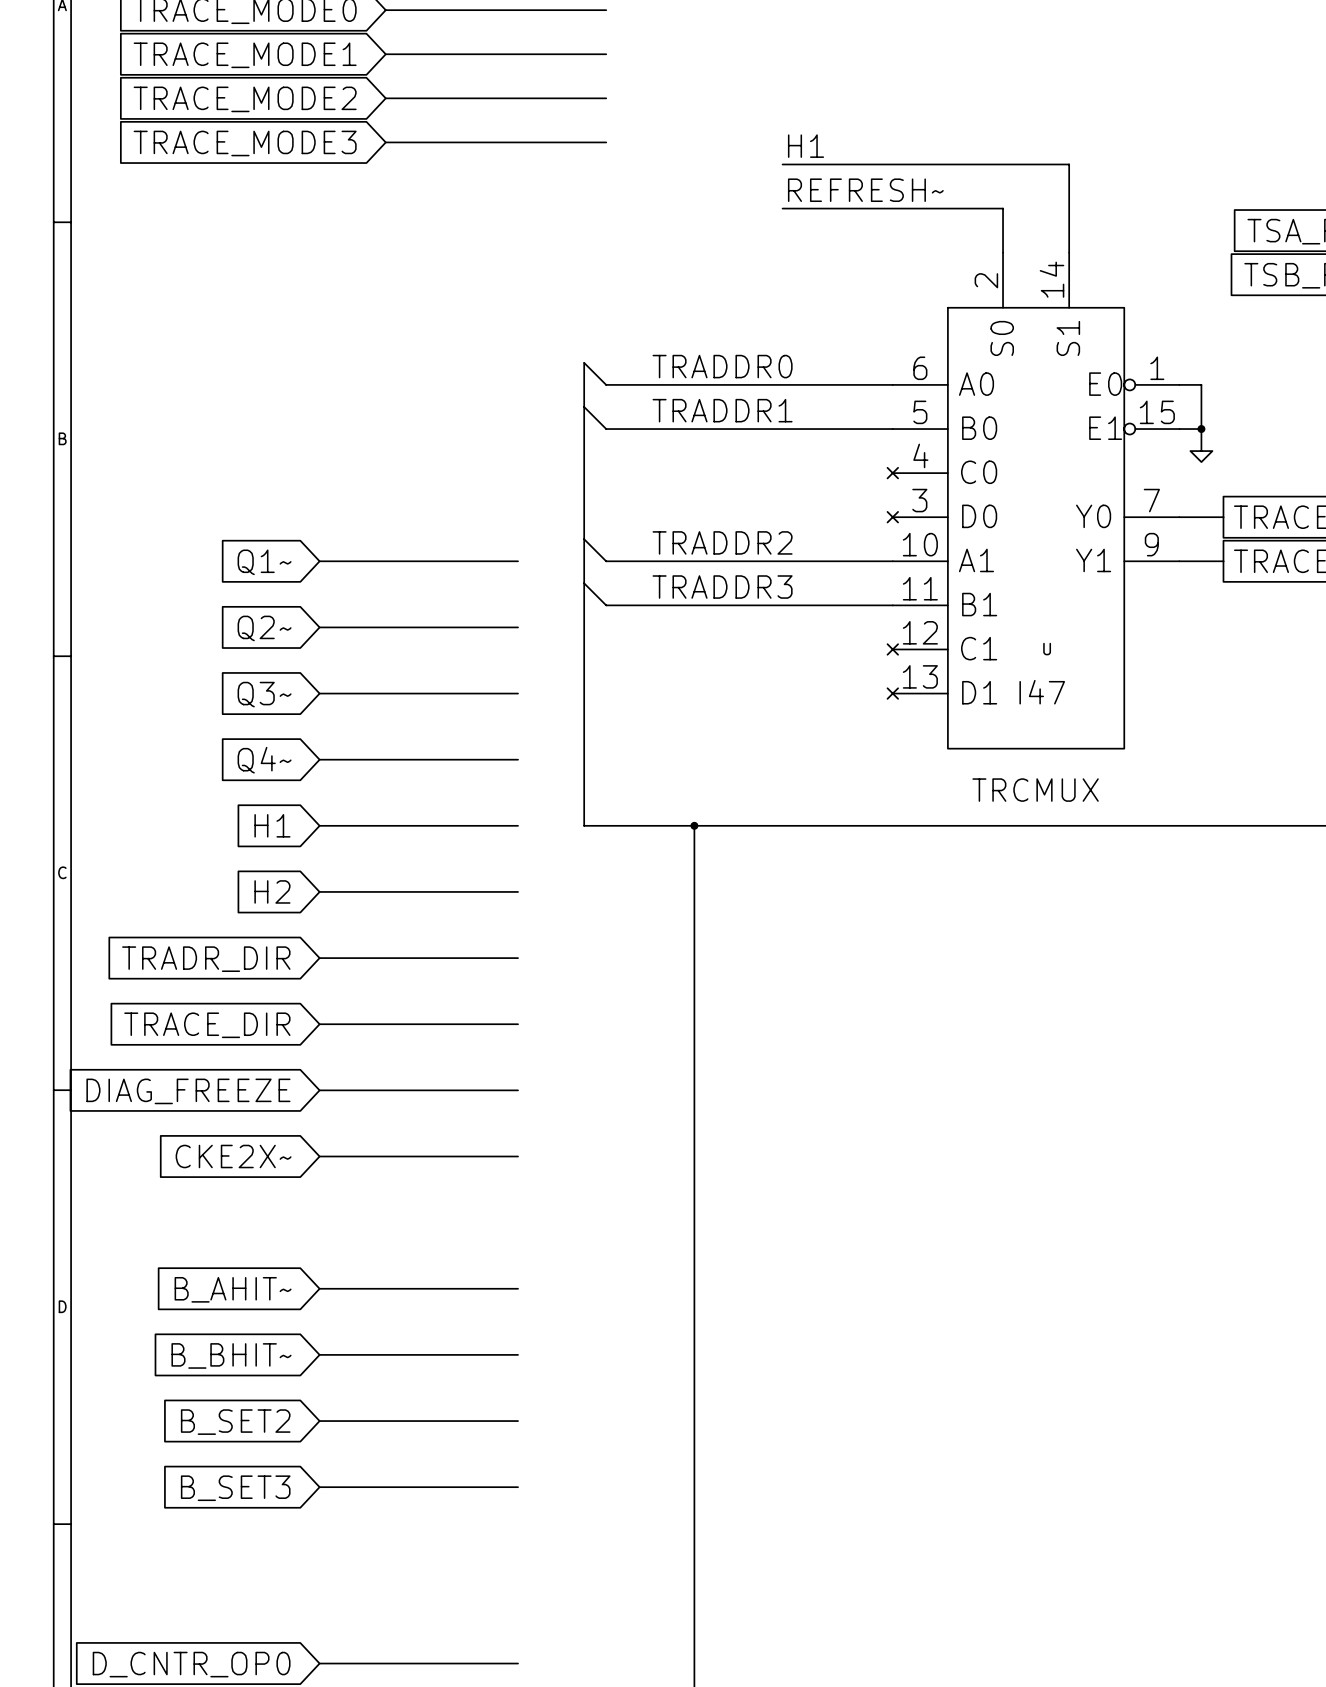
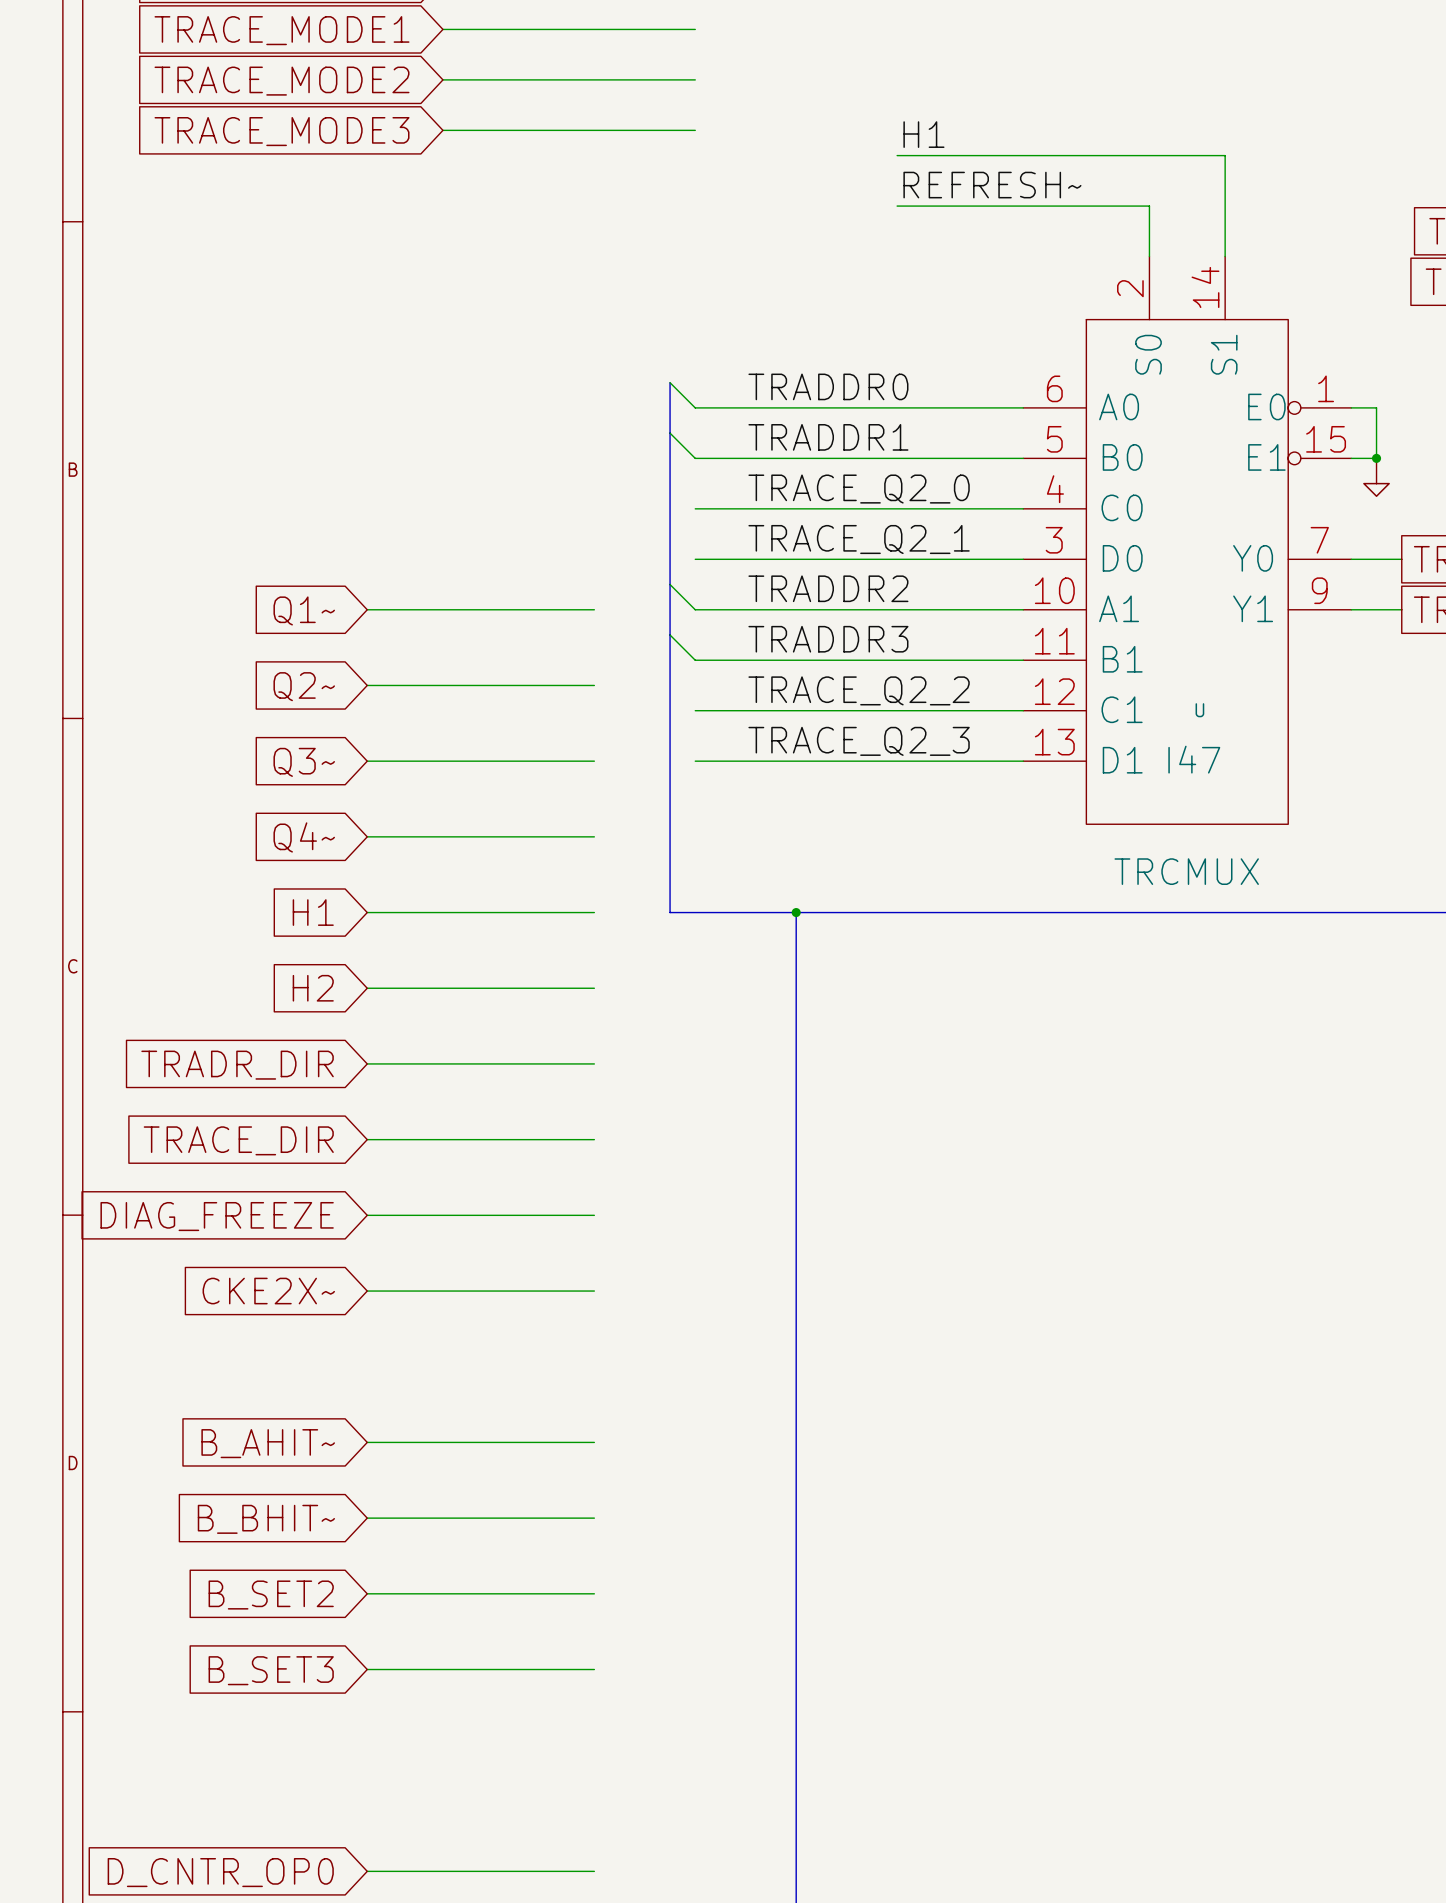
label: none -> TRACE_Q2_0 (859, 489)
wire: none -> (695, 508) (1023, 508)
no-connect mark: (892, 473) -> none
label: none -> TRACE_Q2_1 (859, 539)
wire: none -> (695, 559) (1023, 559)
no-connect mark: (892, 517) -> none
label: none -> TRACE_Q2_2 (859, 690)
wire: none -> (695, 710) (1023, 710)
no-connect mark: (892, 649) -> none
label: none -> TRACE_Q2_3 (859, 741)
wire: none -> (695, 761) (1023, 761)
no-connect mark: (892, 693) -> none

